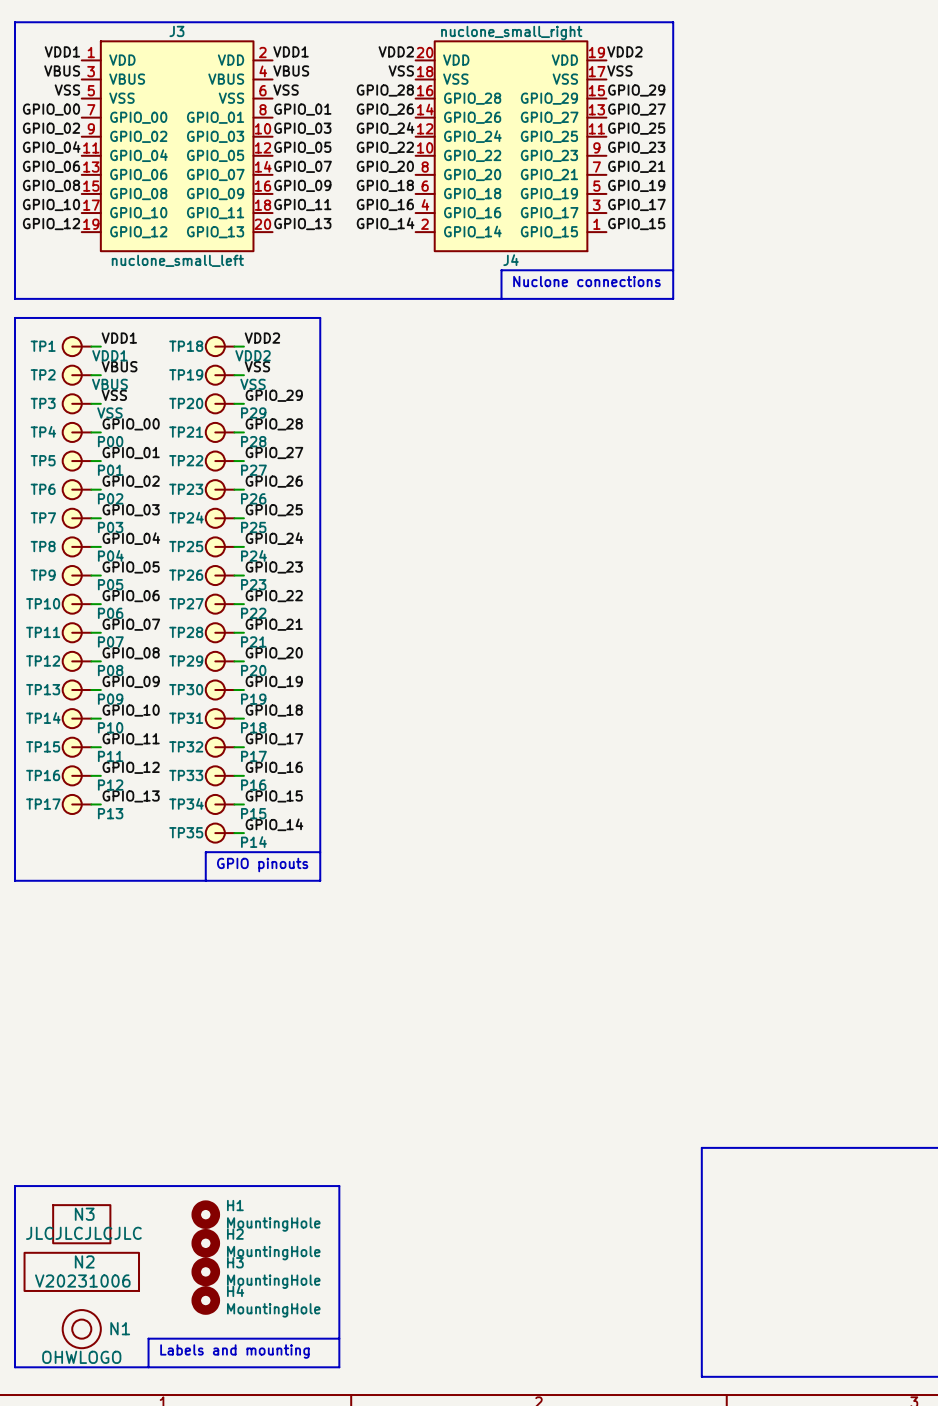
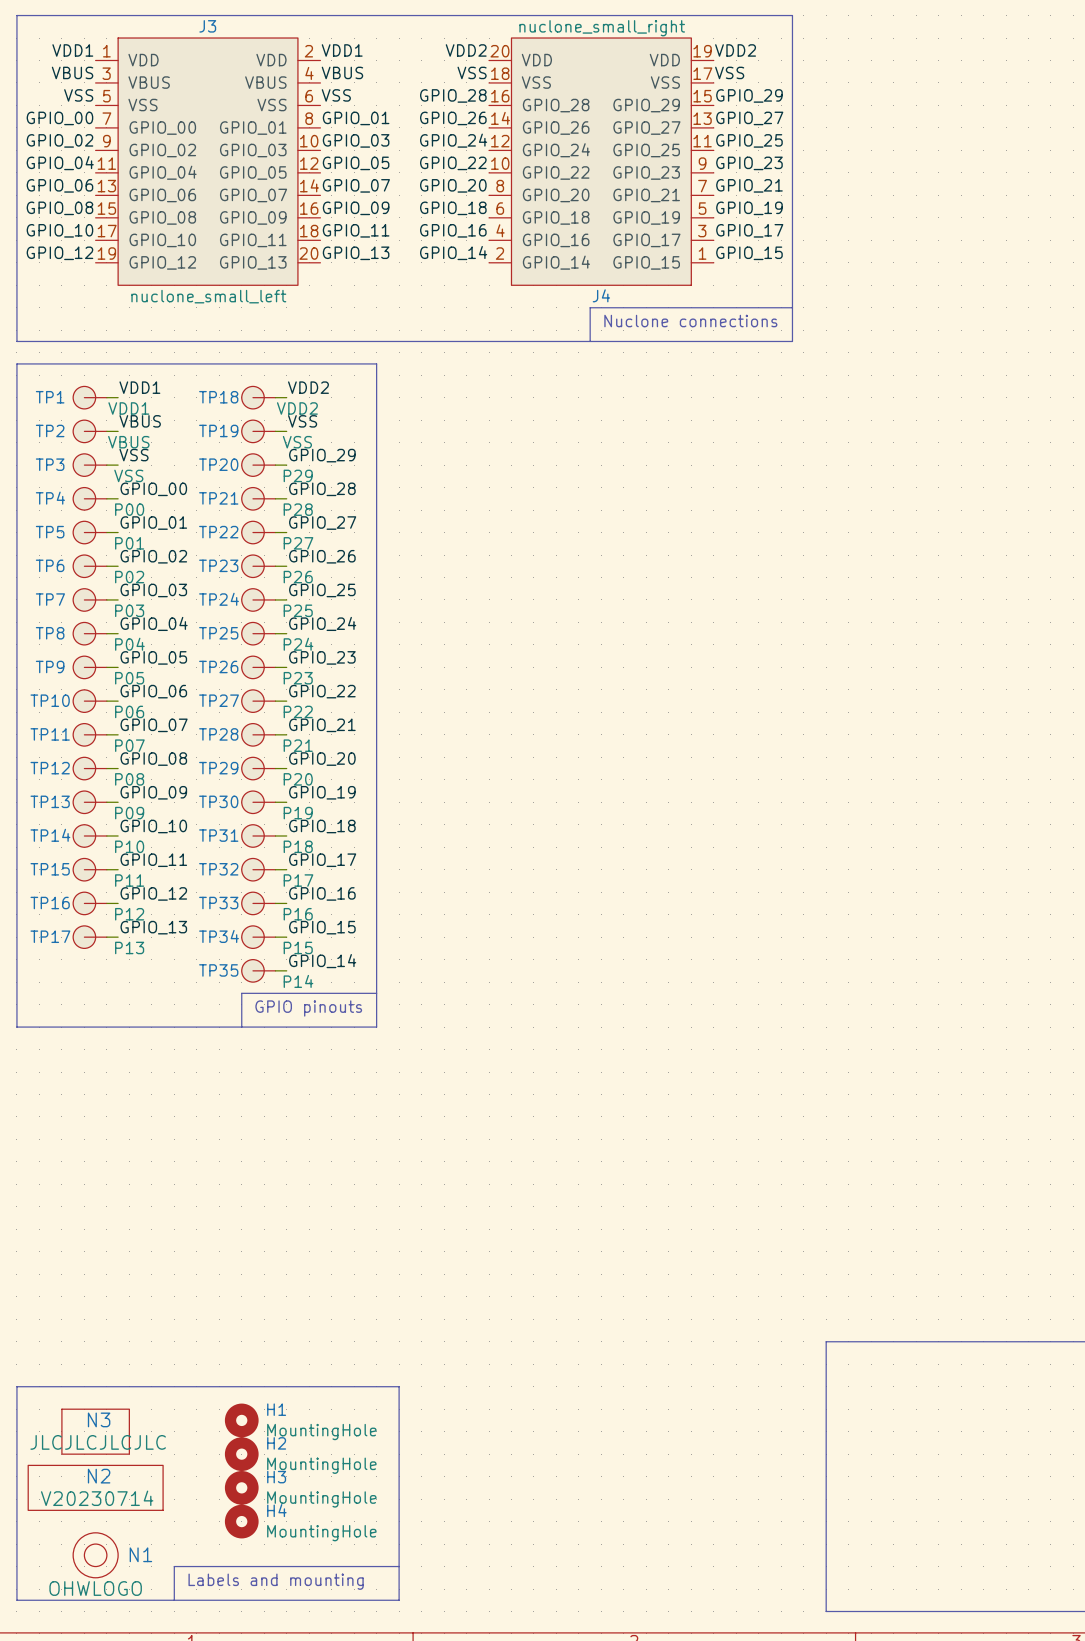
N2 value: V20231006 (82, 1281) -> V20230714 (97, 1498)

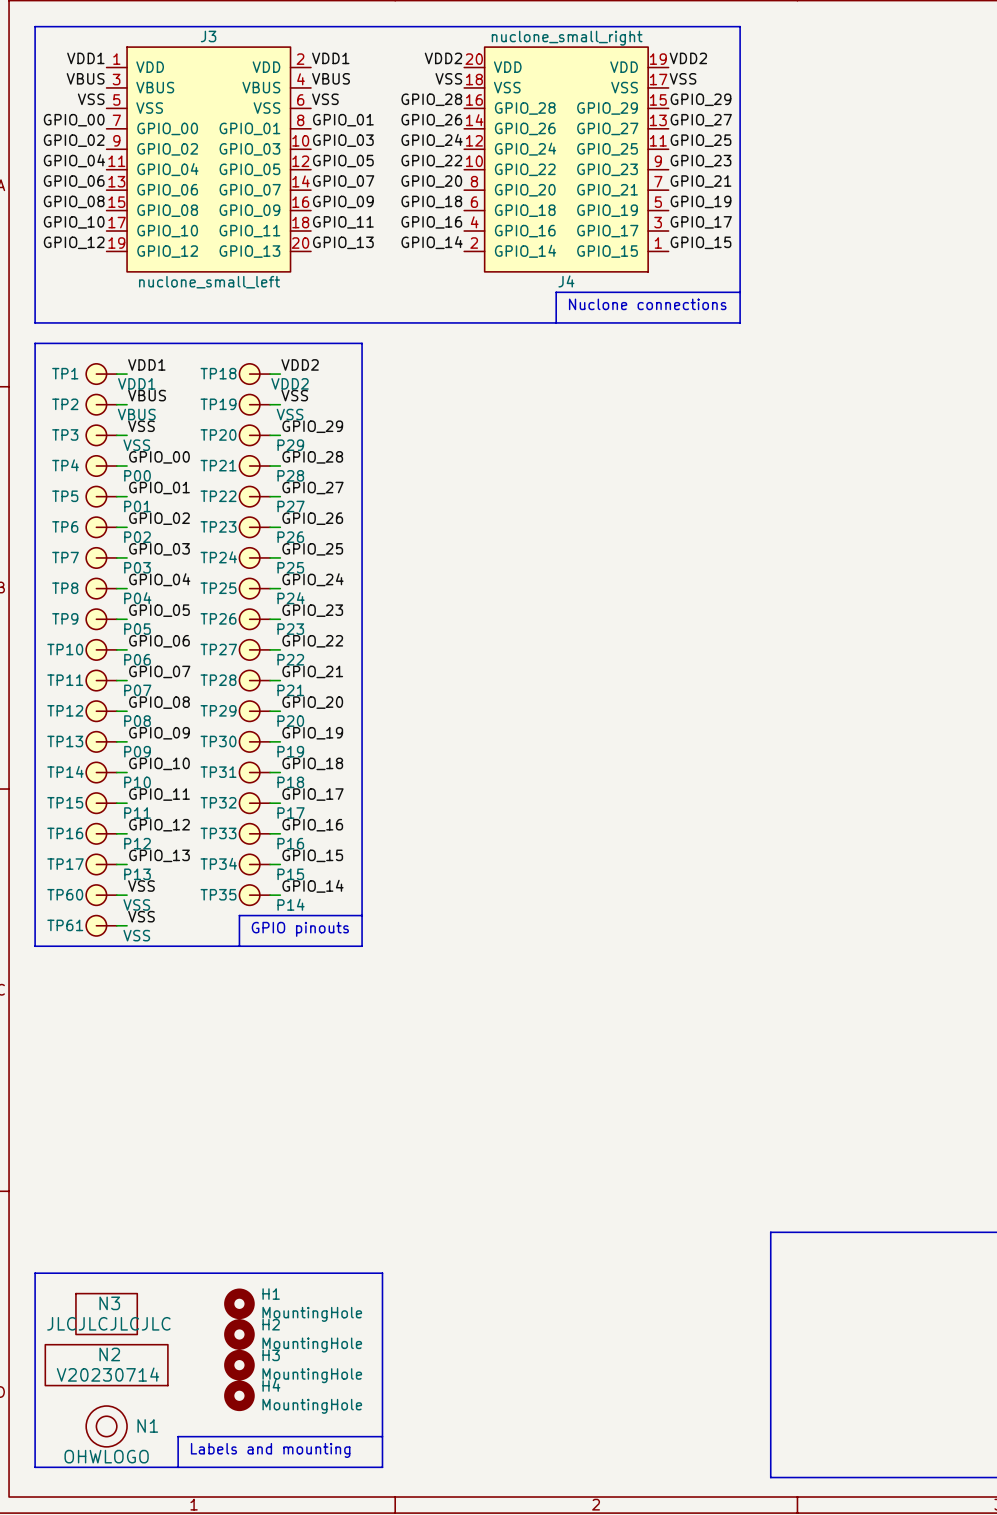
label: none -> VSS (141, 886)
TP60: none -> VSS (101, 895)
wire: none -> (116, 895) (127, 895)
label: none -> VSS (141, 916)
TP61: none -> VSS (101, 925)
wire: none -> (116, 925) (127, 925)

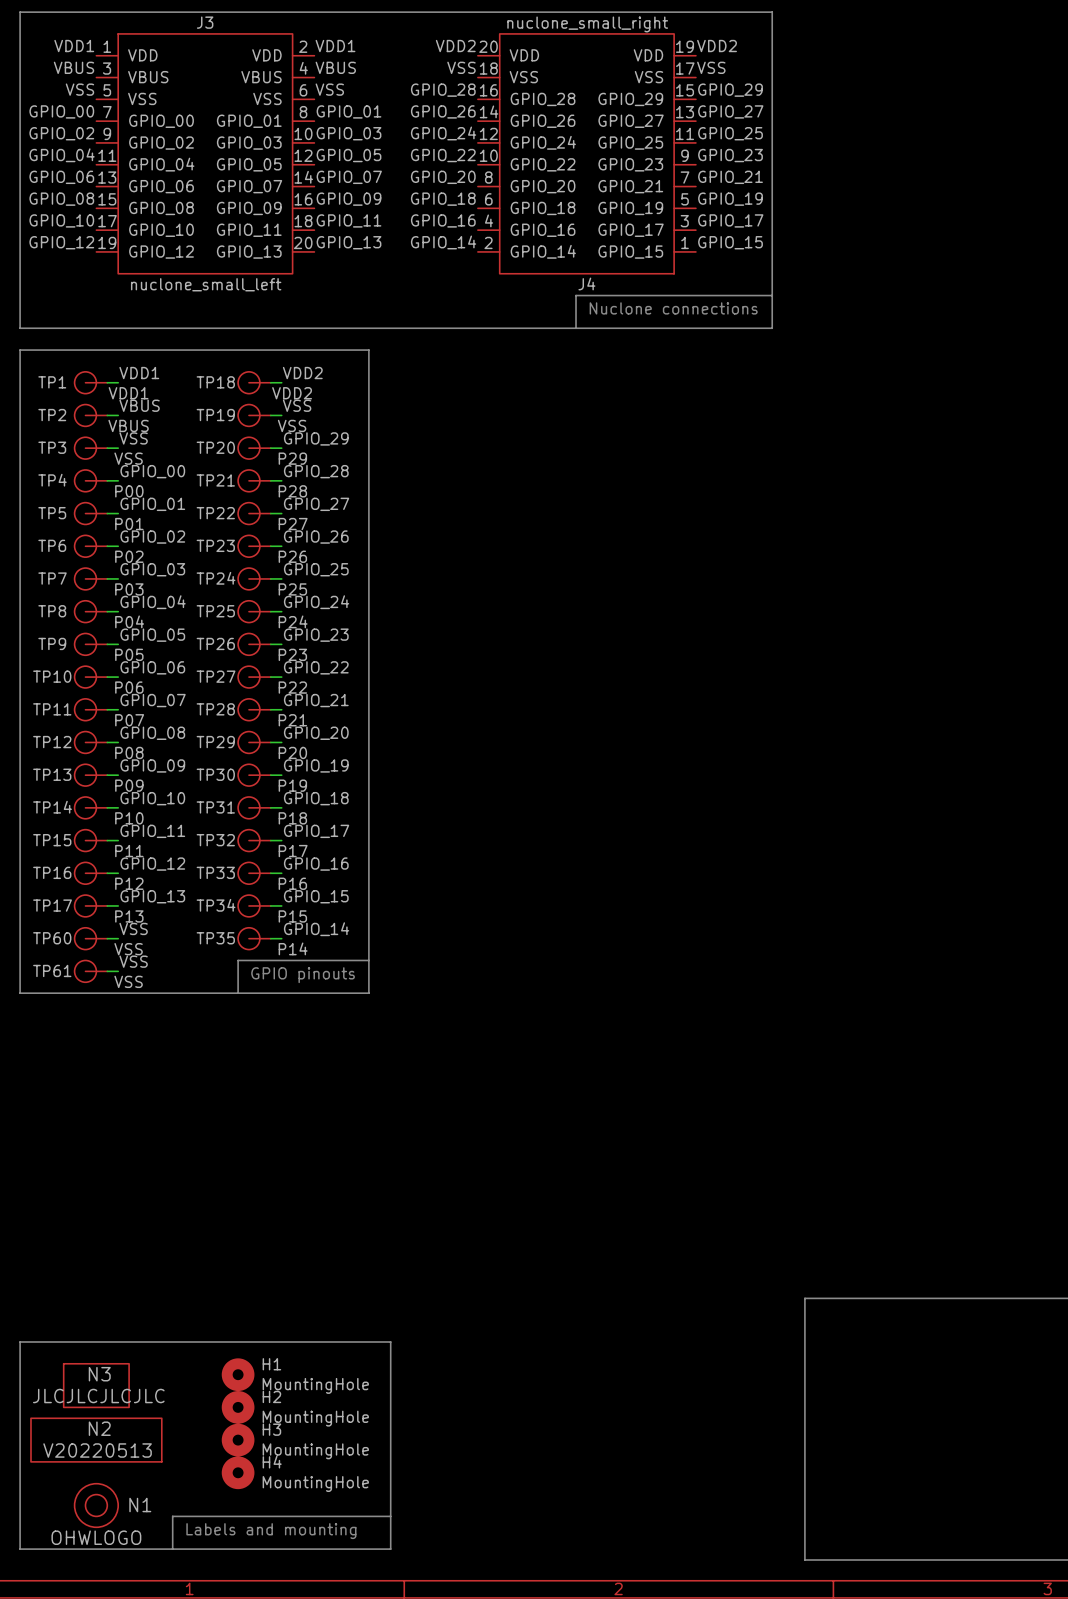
N2 value: V20230714 (108, 1374) -> V20220513 (97, 1450)

